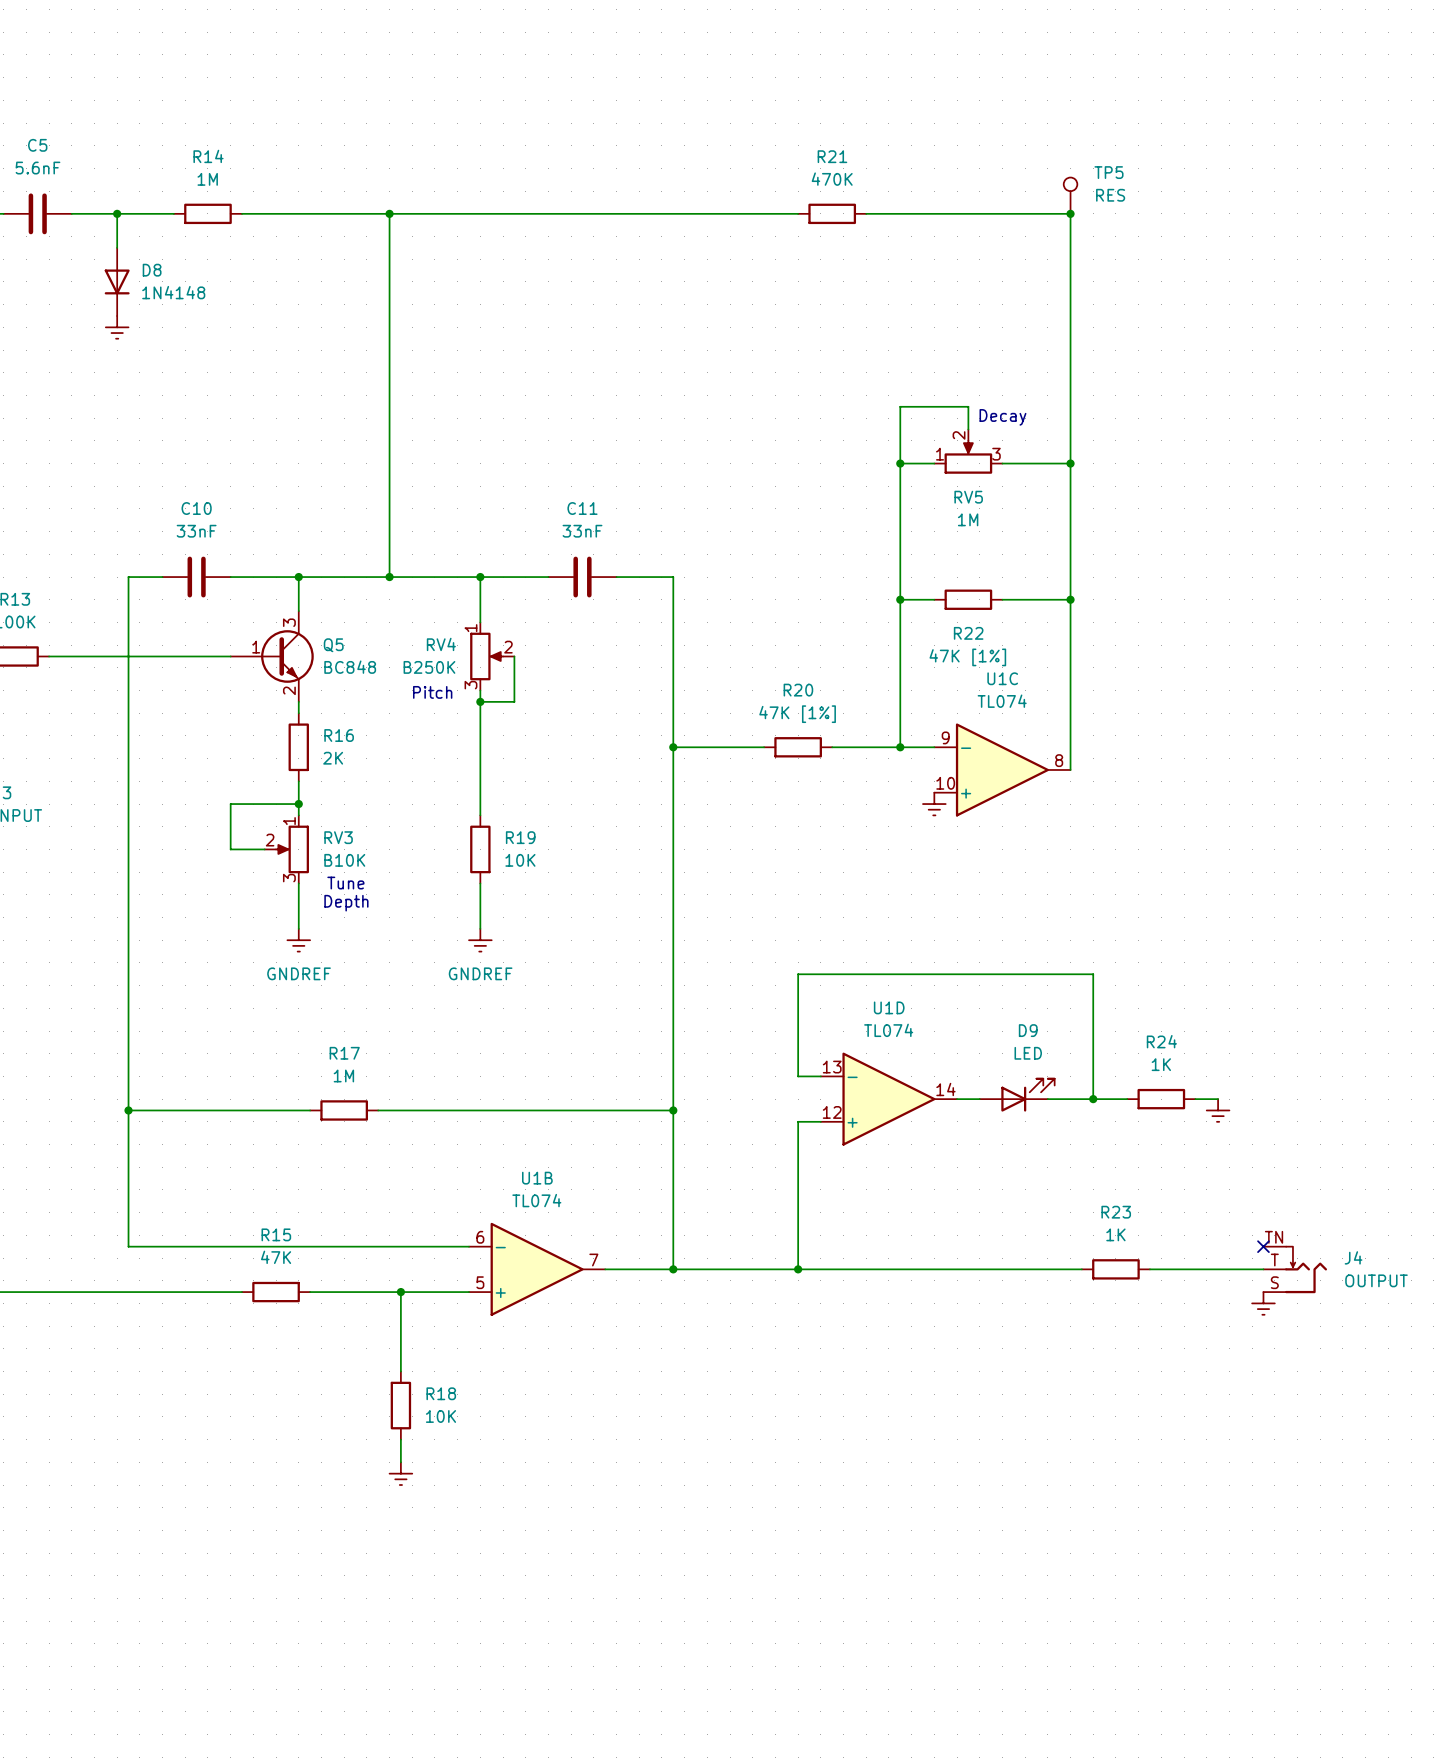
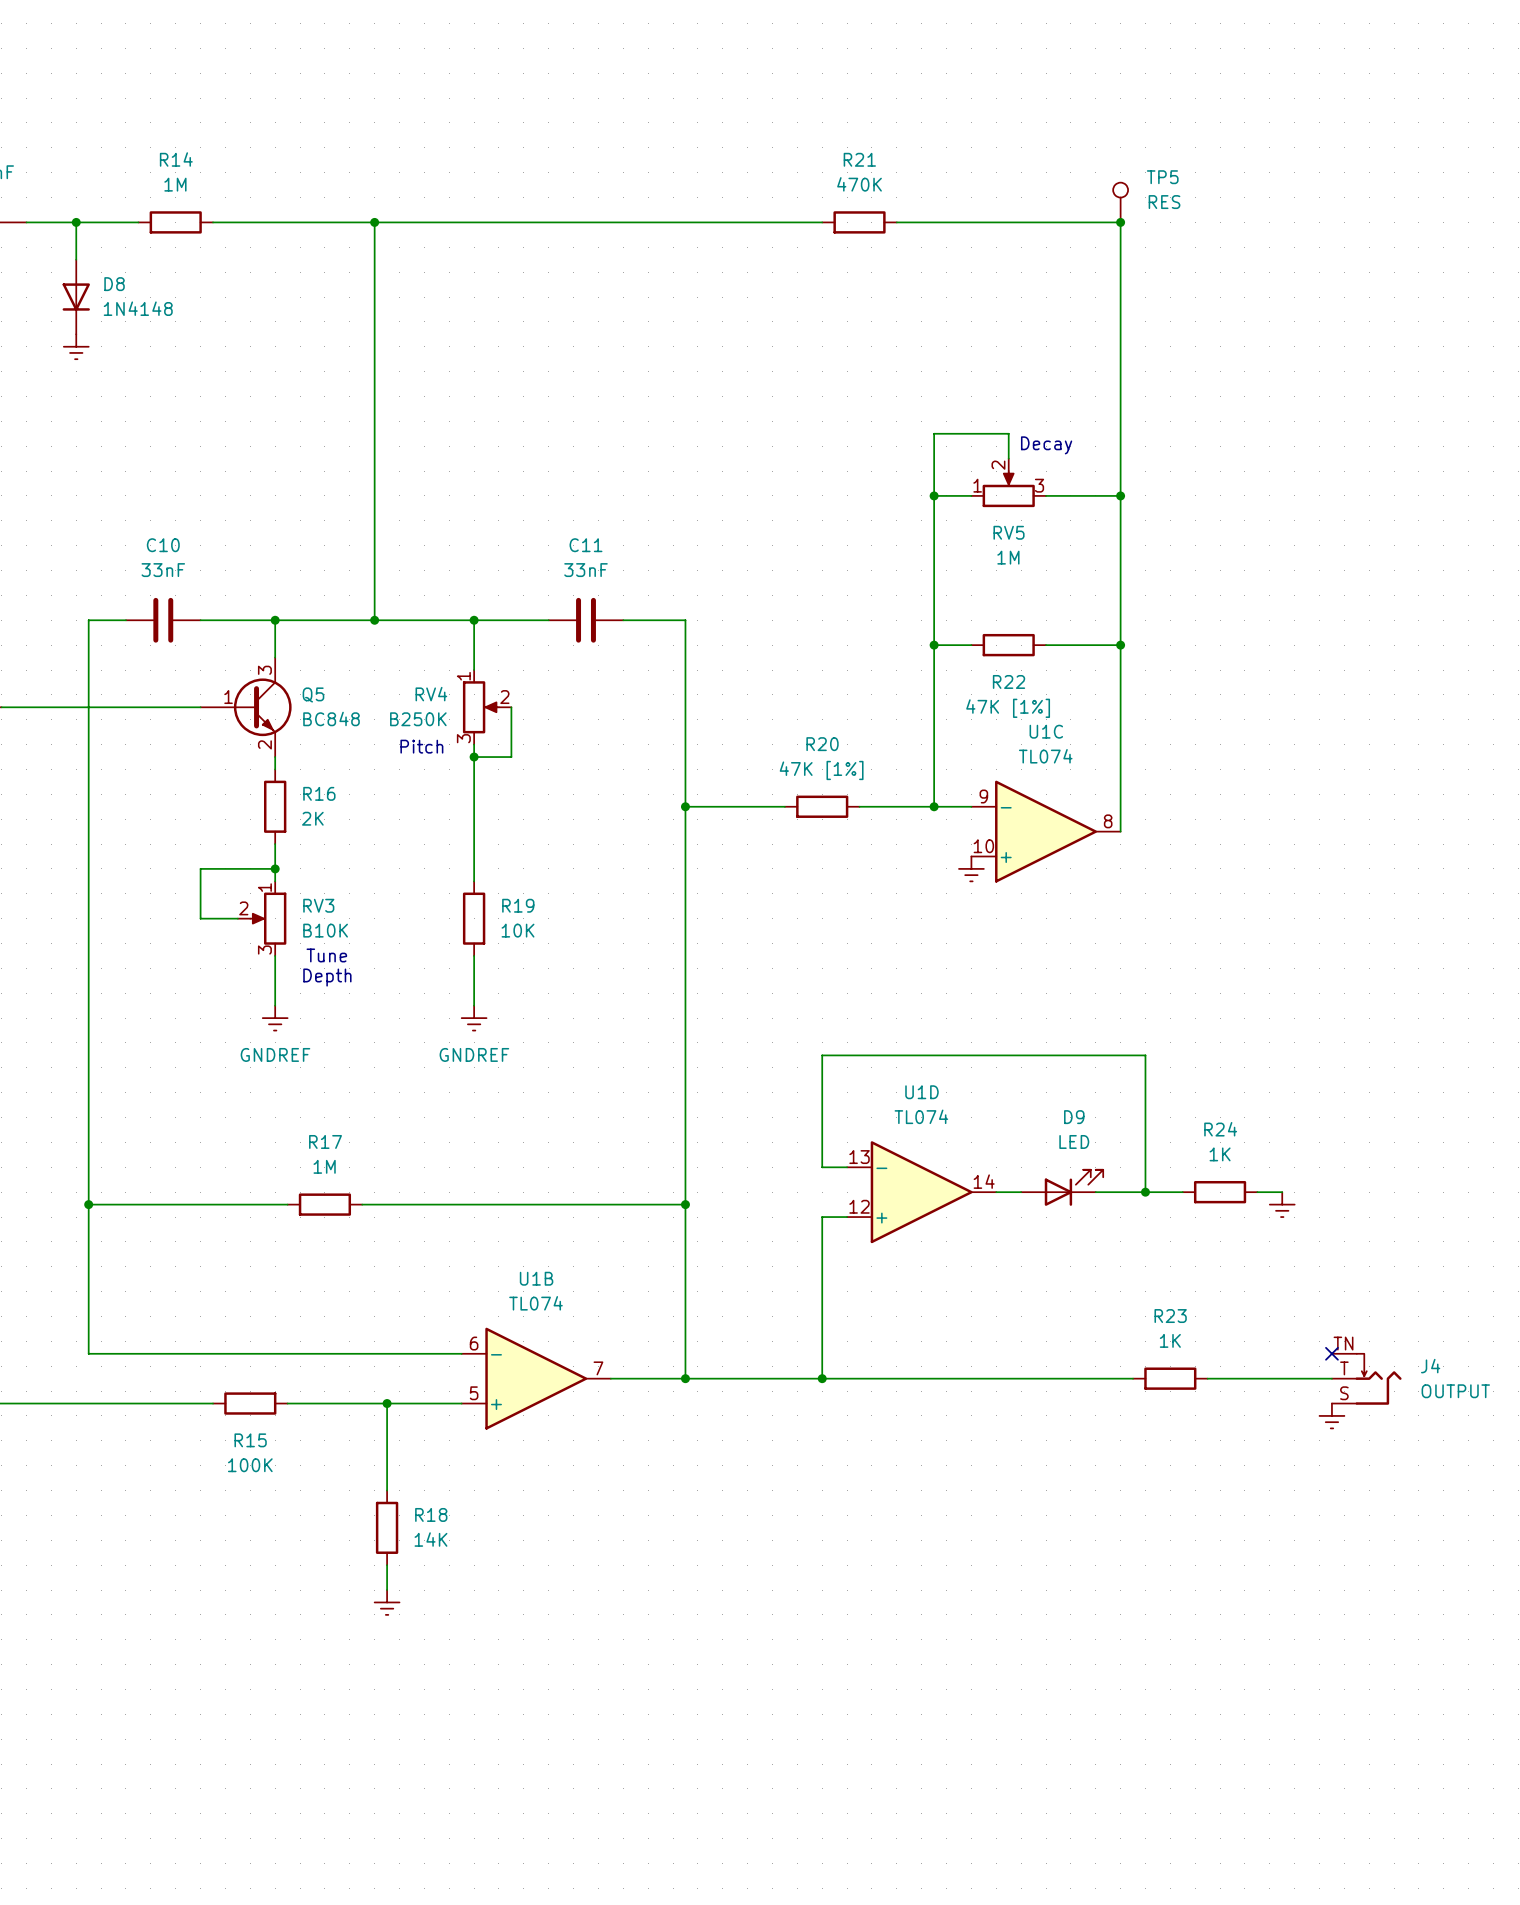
R15 name position: R15 (276, 1234) -> R15 (250, 1440)
R15 value: 47K (276, 1257) -> 100K (250, 1465)
R18 value: 10K (440, 1416) -> 14K (430, 1539)

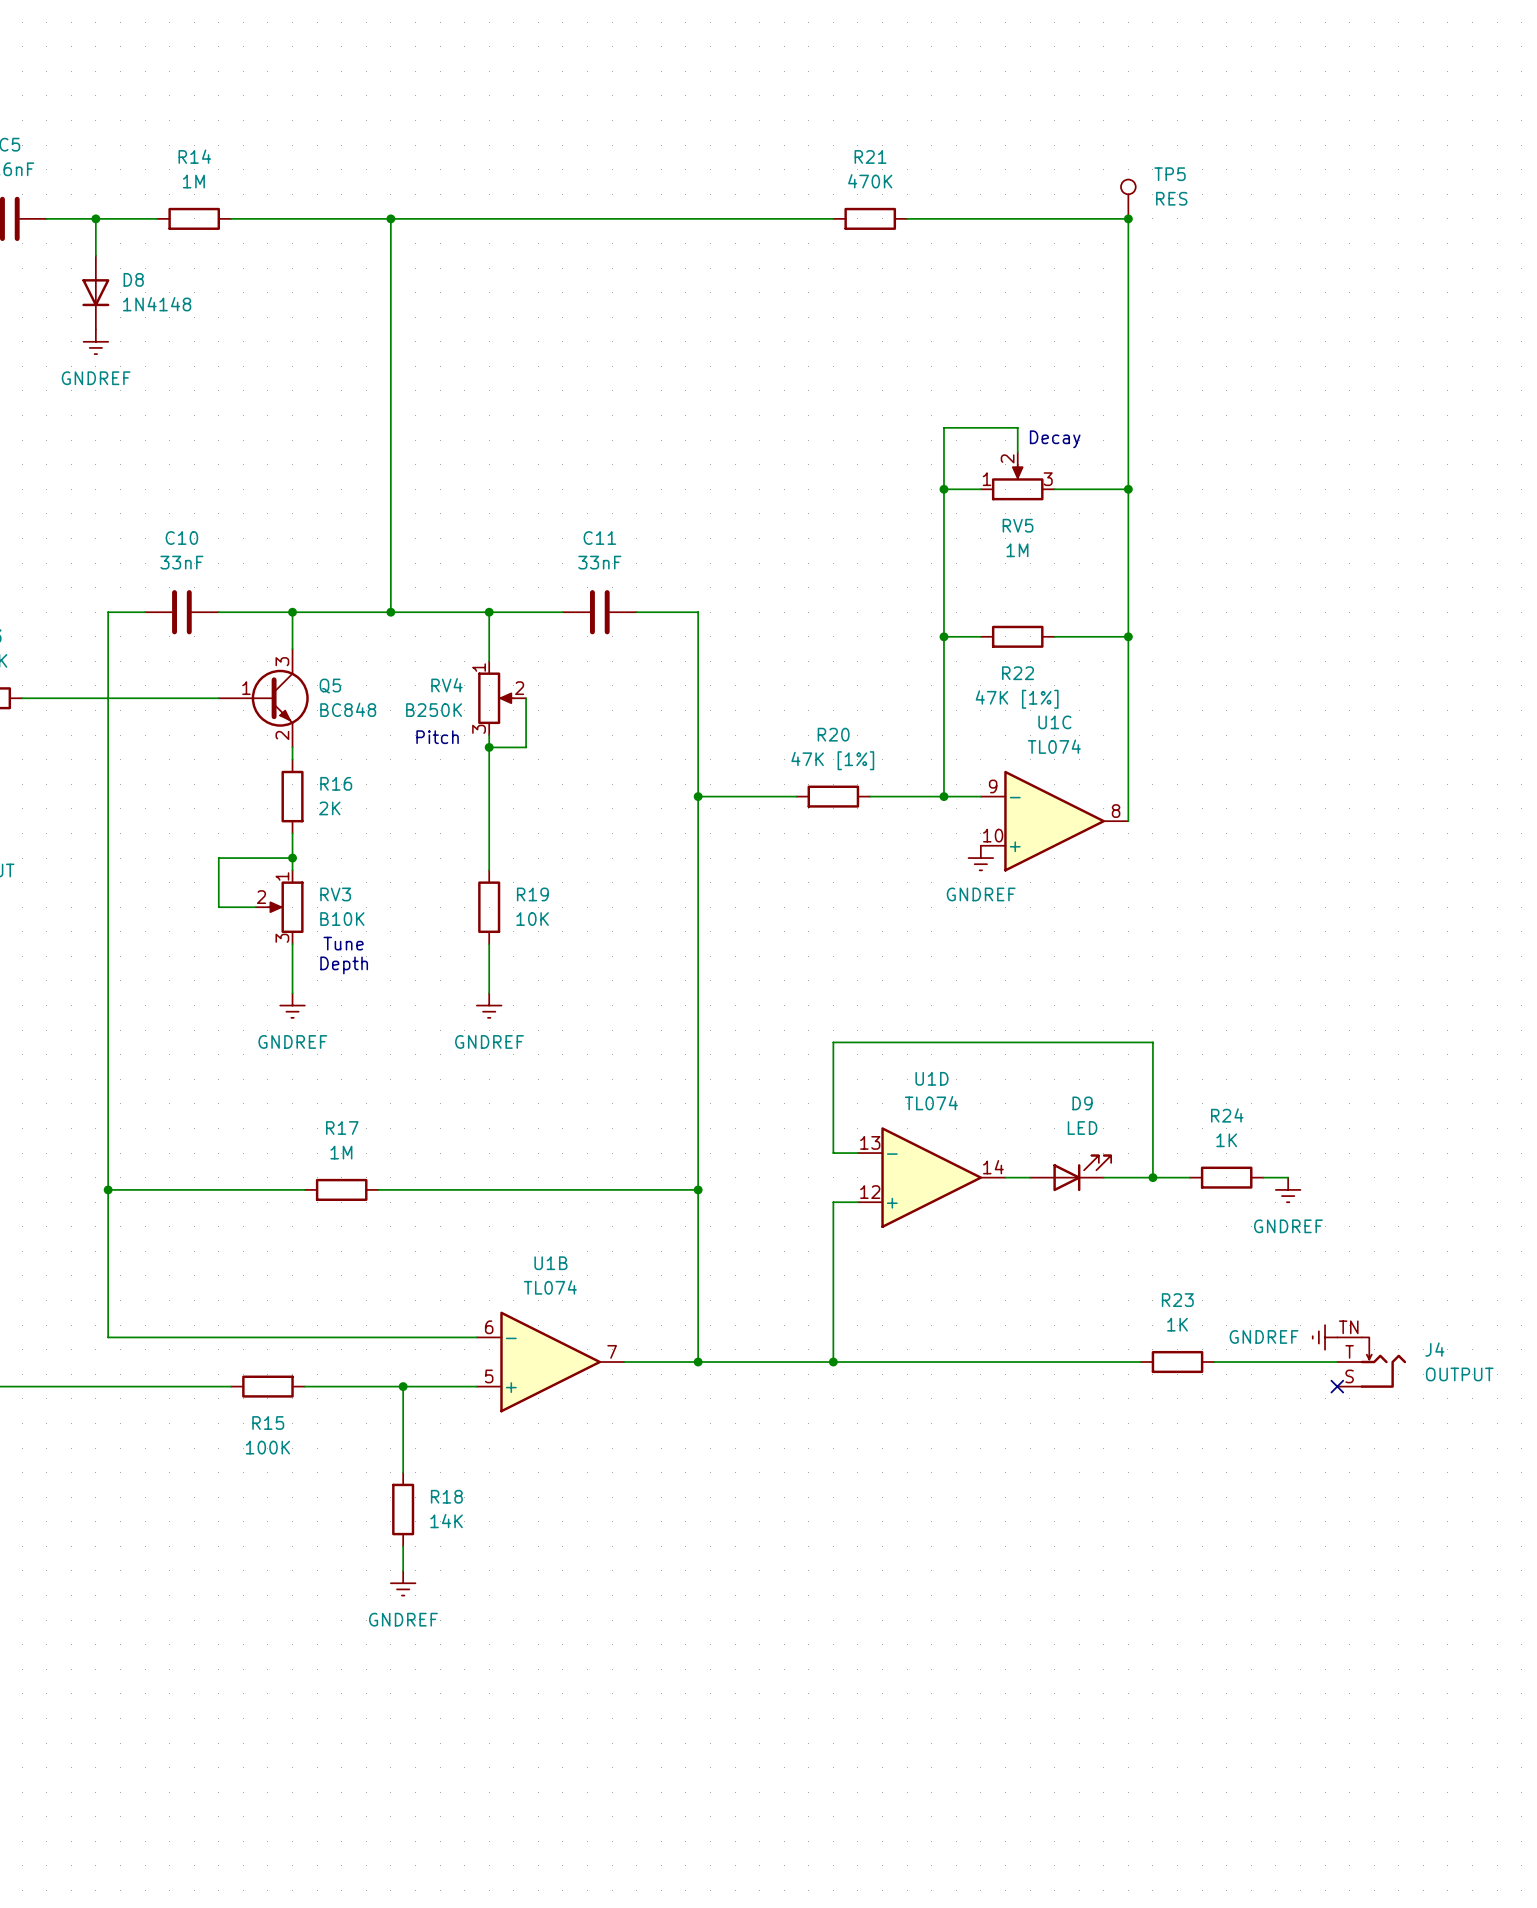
power symbol text: none -> GNDREF (96, 378)
power symbol text: none -> GNDREF (981, 894)
power symbol text: none -> GNDREF (1288, 1226)
power symbol: none -> GNDREF (1325, 1337)
no-connect mark position: (1331, 1353) -> (1337, 1386)
power symbol: (1331, 1415) -> none
power symbol text: none -> GNDREF (403, 1619)

